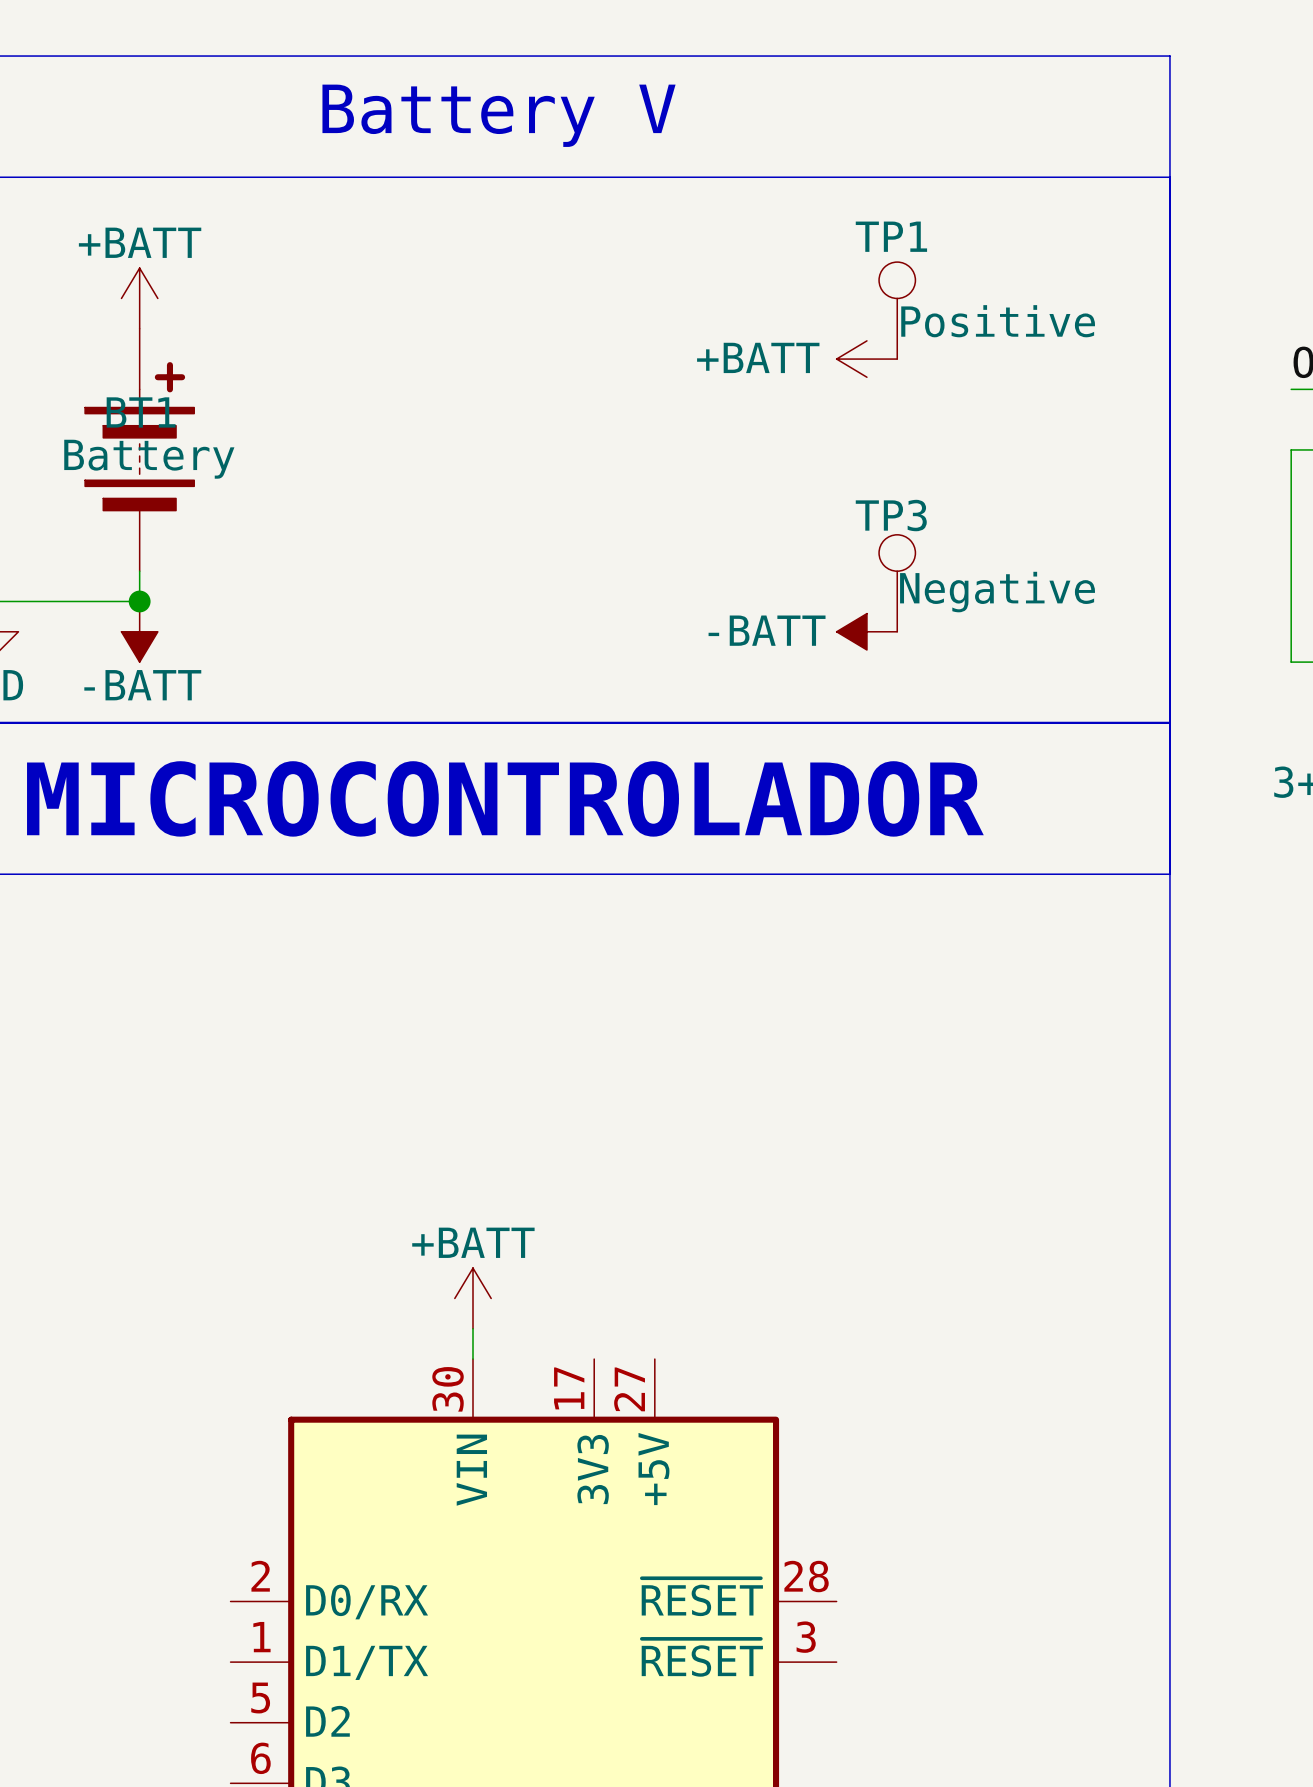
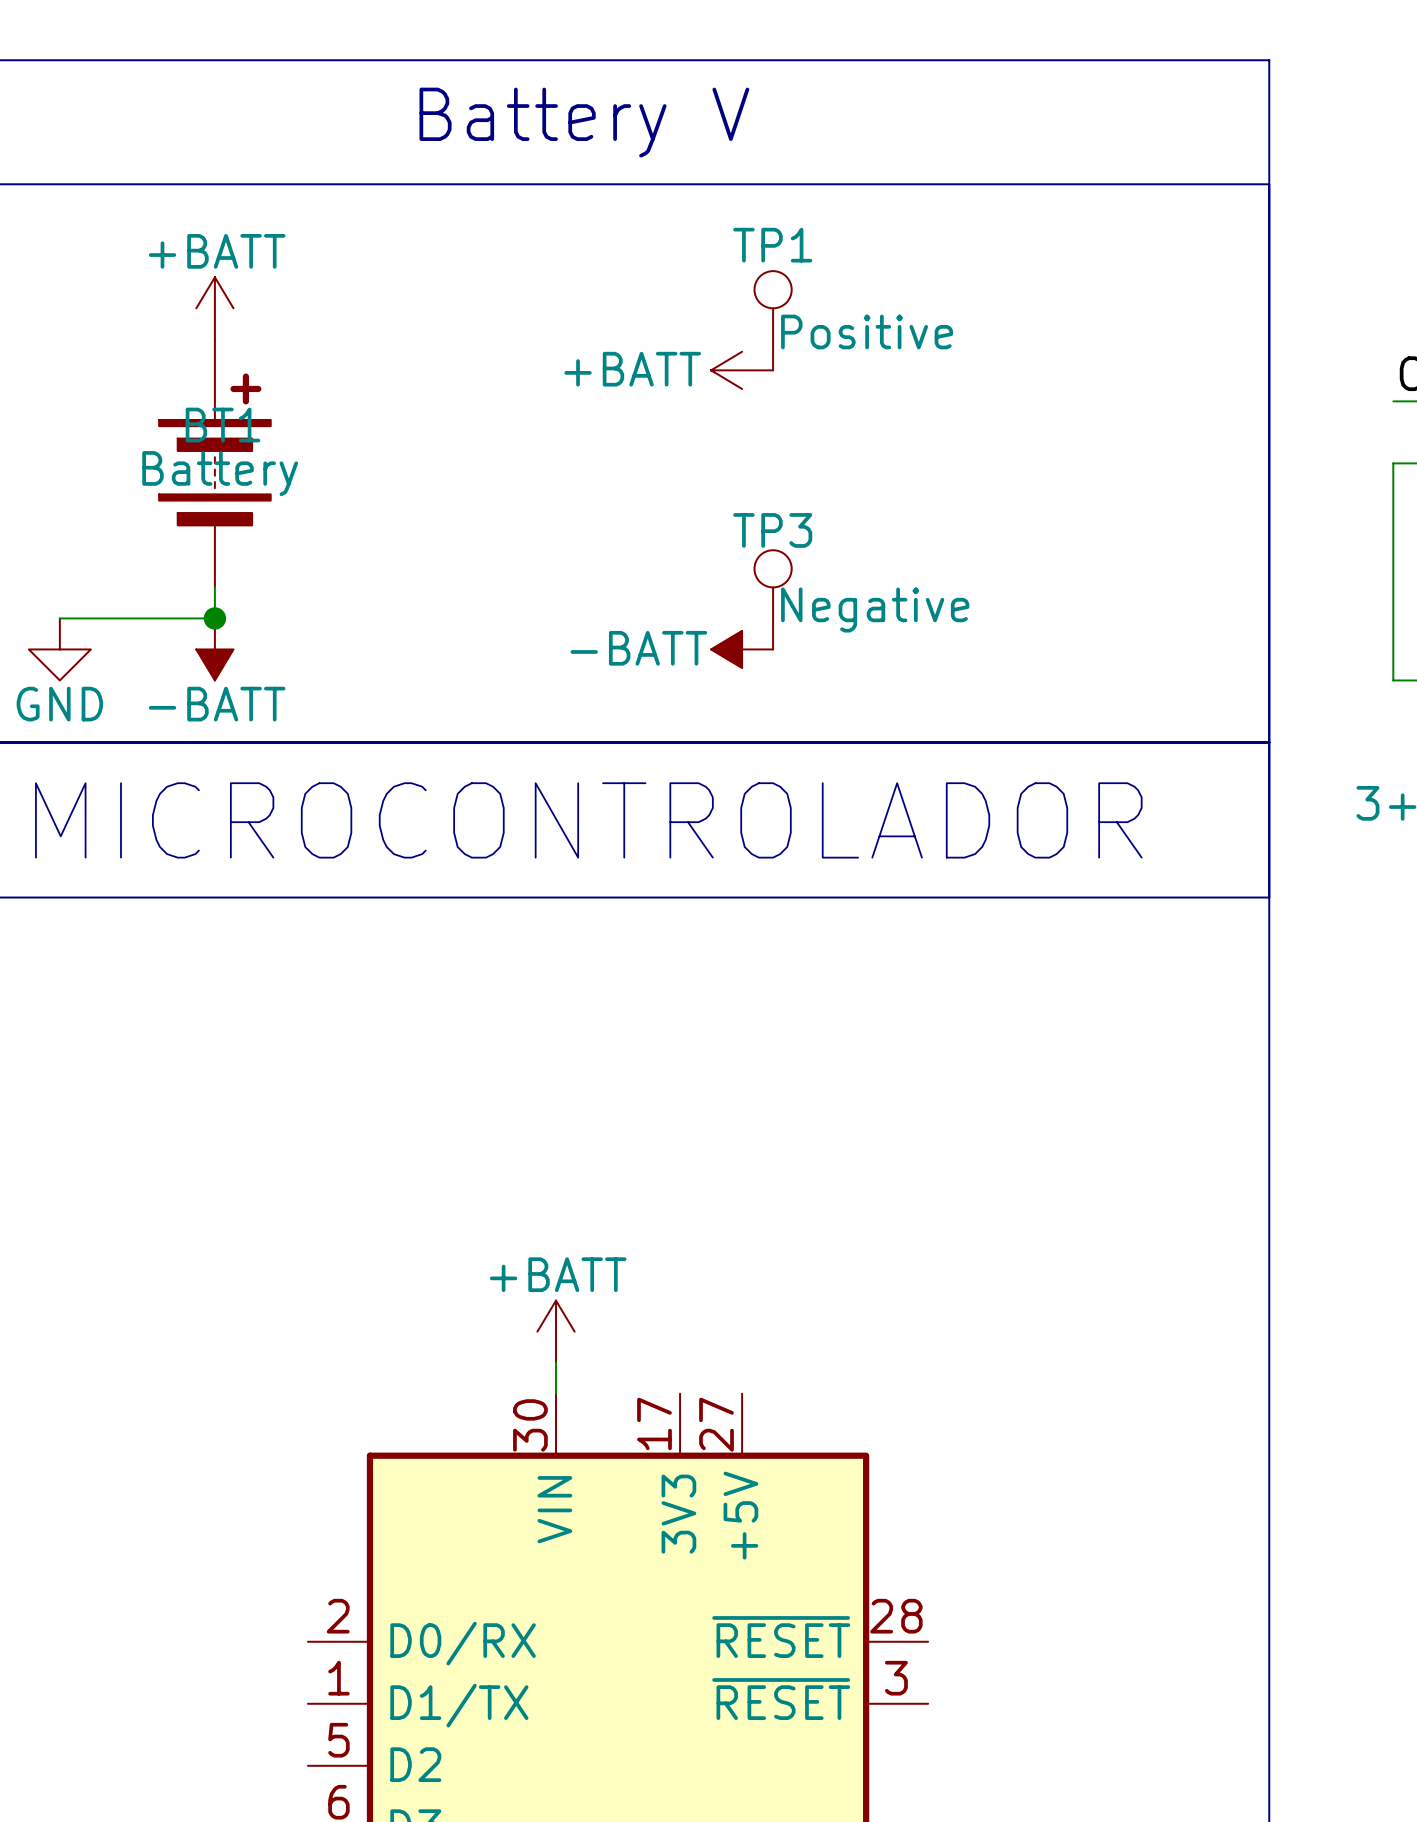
TP1 position: (897, 310) -> (773, 320)
power symbol position: +BATT (866, 359) -> +BATT (742, 370)
TP3 position: (897, 583) -> (773, 599)
power symbol position: -BATT (866, 631) -> -BATT (742, 649)

